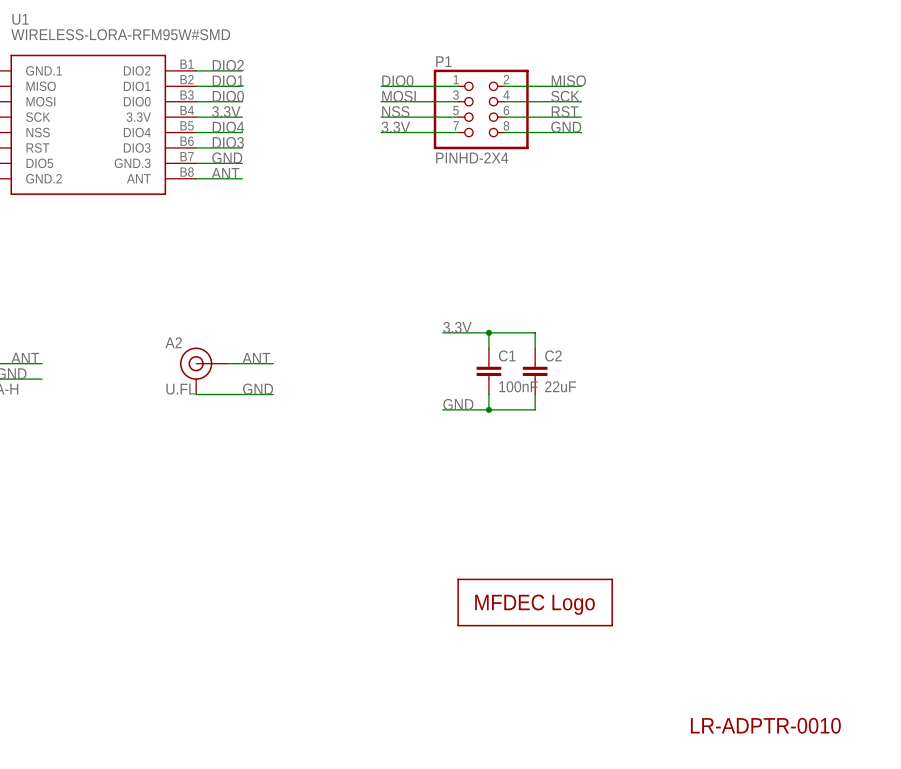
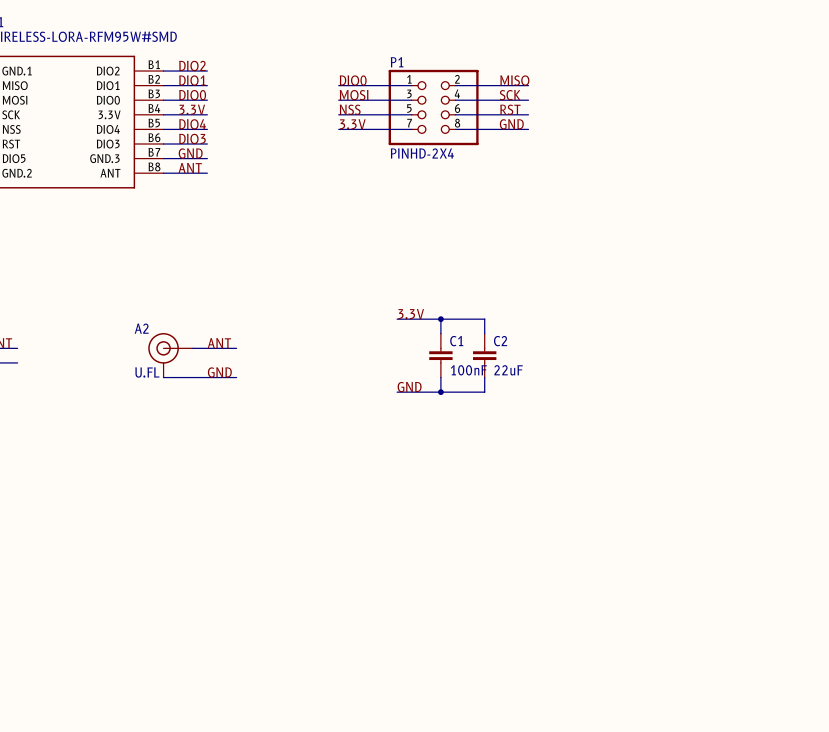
part: (535, 602) -> none
text: LR-ADPTR-0010 (765, 725) -> none

